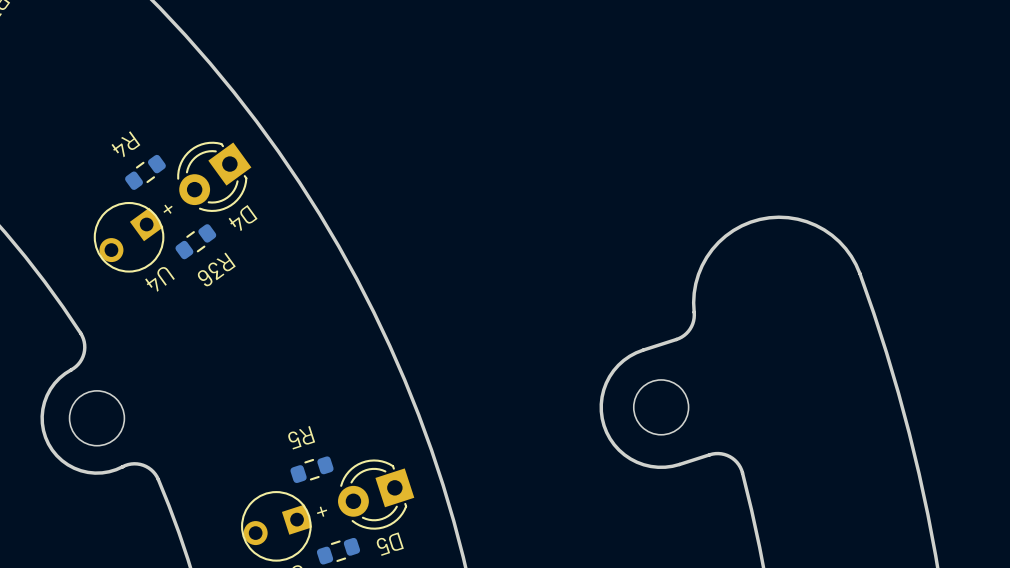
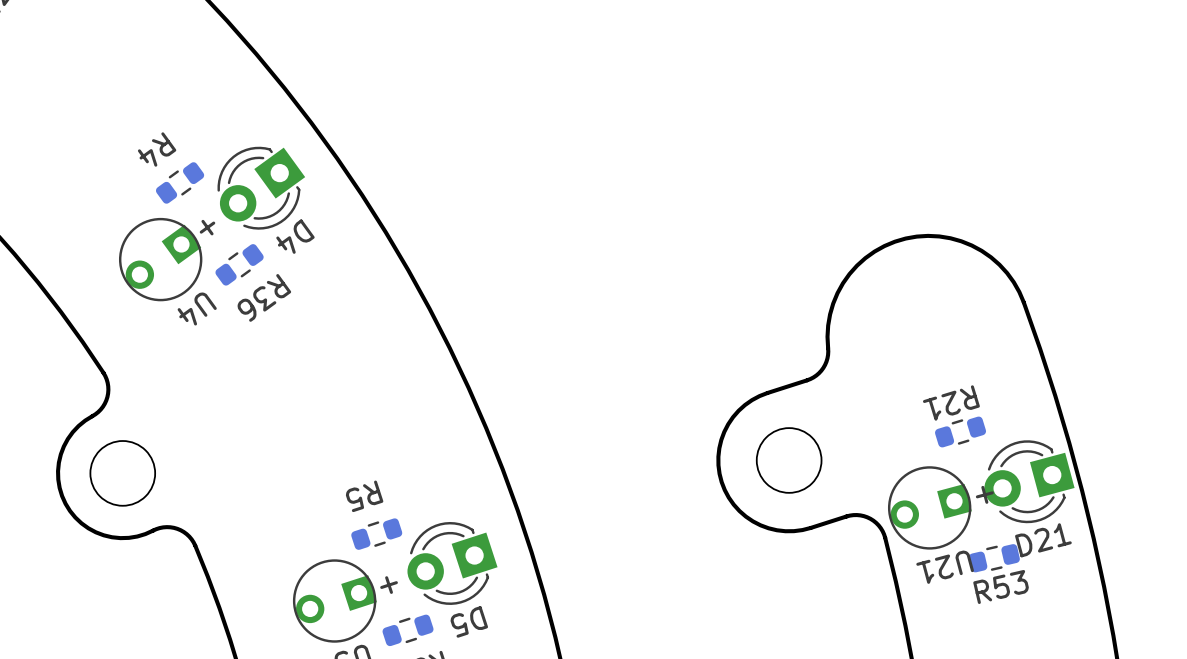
R21: none -> (960, 432)
D21: none -> (1029, 481)
U21: none -> (929, 507)
R53: none -> (994, 558)

